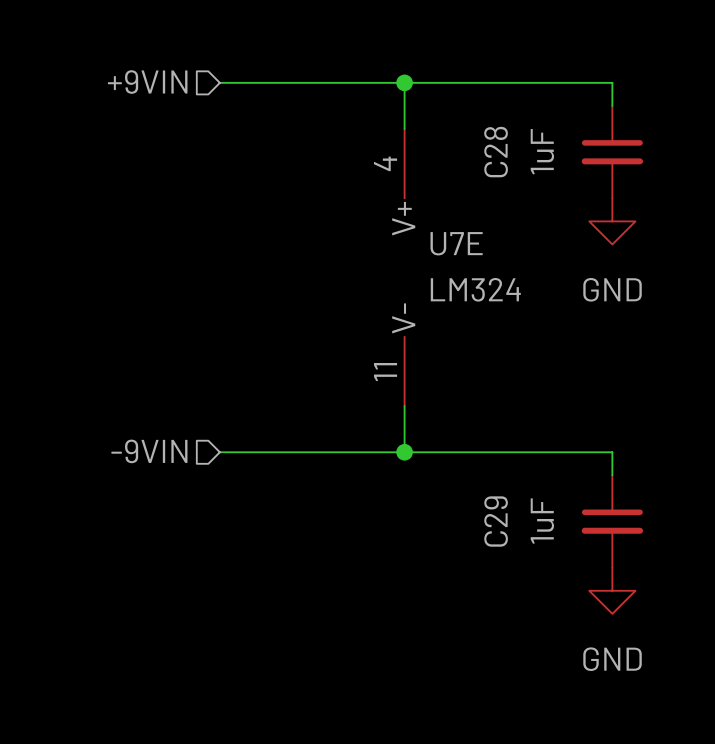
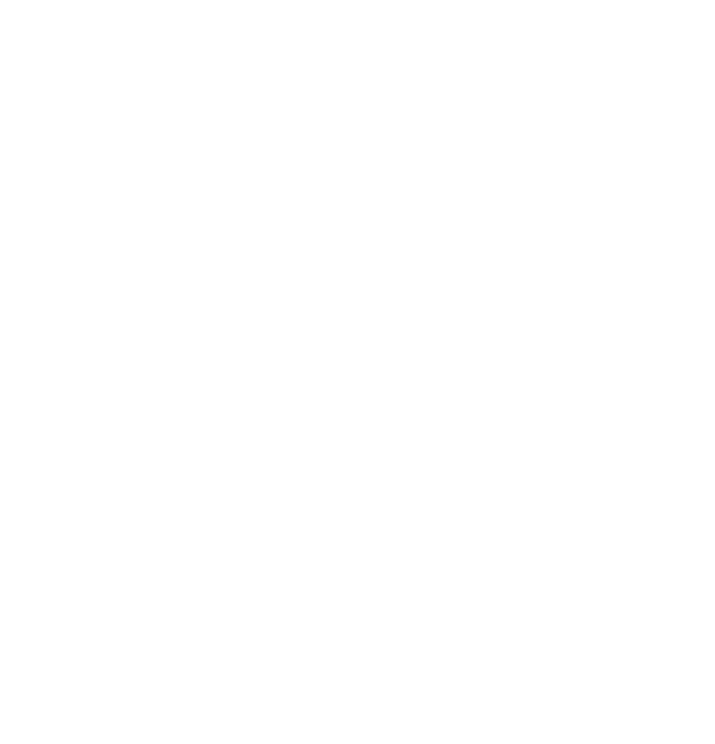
hierarchical label: +9VIN (147, 82) -> none
wire: (219, 82) (612, 82) (612, 105) -> none
wire: (404, 82) (404, 129) -> none
junction: (404, 82) -> none
C28: 1uF (612, 152) -> none
power symbol: GND (612, 221) -> none
U7E: LM324 (404, 267) -> none
wire: (404, 406) (404, 452) -> none
hierarchical label: -9VIN (149, 451) -> none
wire: (219, 452) (612, 452) (612, 475) -> none
junction: (404, 452) -> none
C29: 1uF (612, 521) -> none
power symbol: GND (612, 590) -> none

